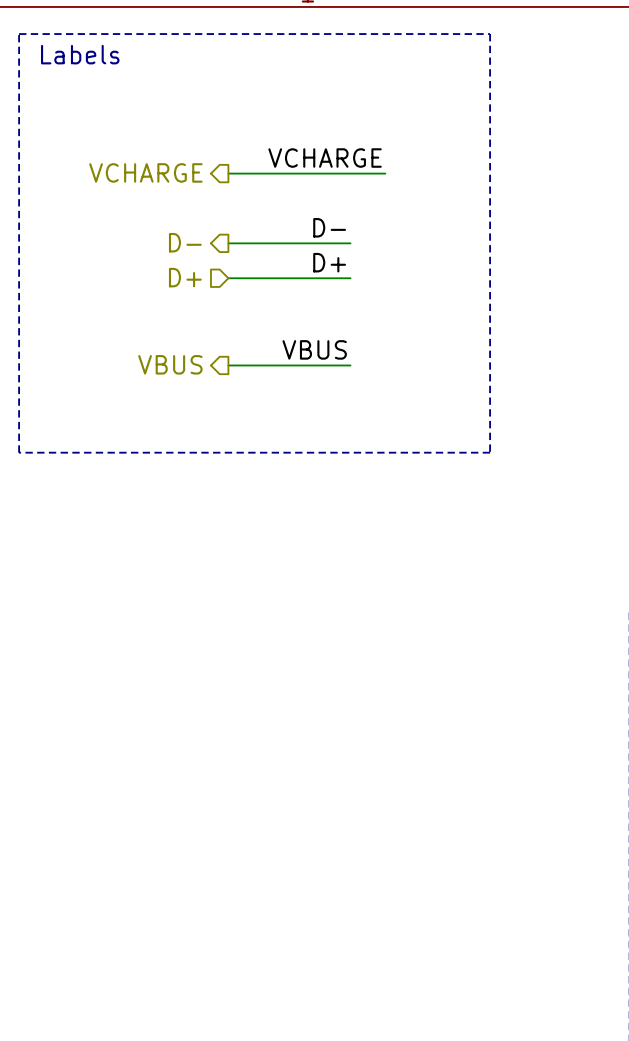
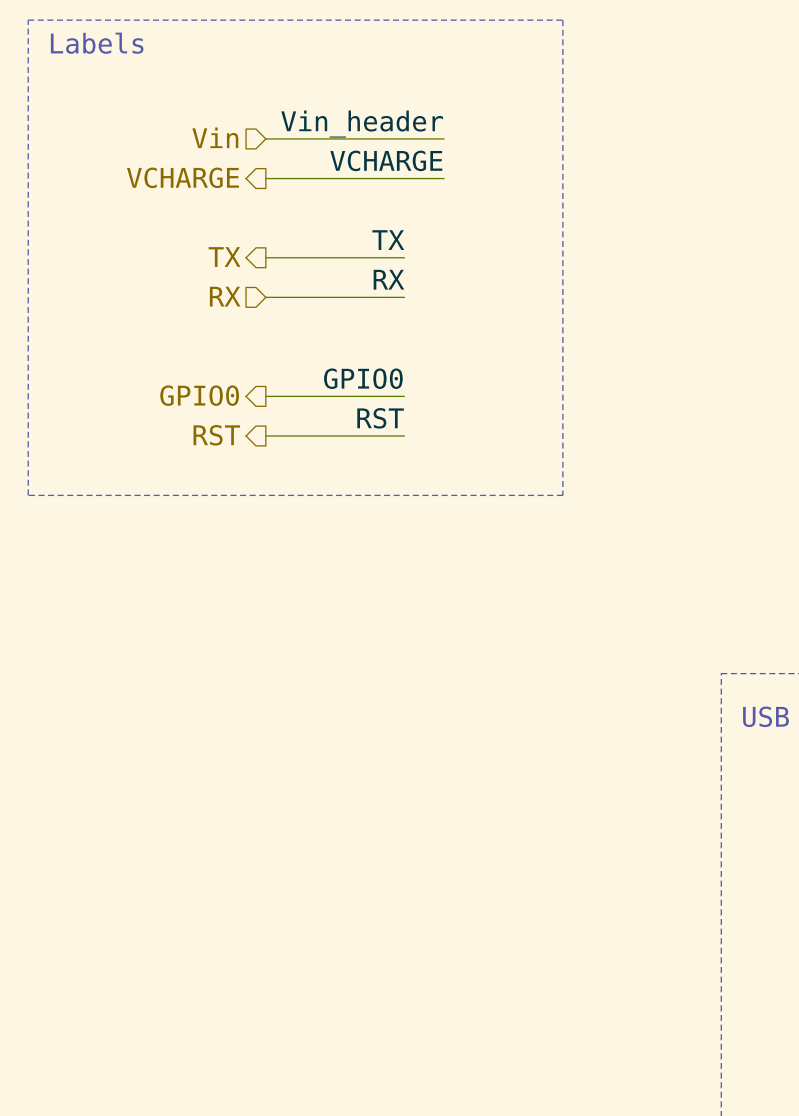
label: none -> Vin_header (362, 124)
hierarchical label: none -> Vin (215, 137)
wire: none -> (265, 138) (444, 138)
label: D- (329, 227) -> TX (388, 240)
hierarchical label: D- (185, 242) -> TX (224, 257)
label: D+ (329, 262) -> RX (388, 279)
hierarchical label: D+ (185, 277) -> RX (225, 296)
label: VBUS (314, 349) -> GPIO0 (363, 378)
hierarchical label: VBUS (170, 364) -> GPIO0 (199, 395)
label: none -> RST (380, 418)
hierarchical label: none -> RST (216, 435)
wire: none -> (265, 435) (404, 435)

